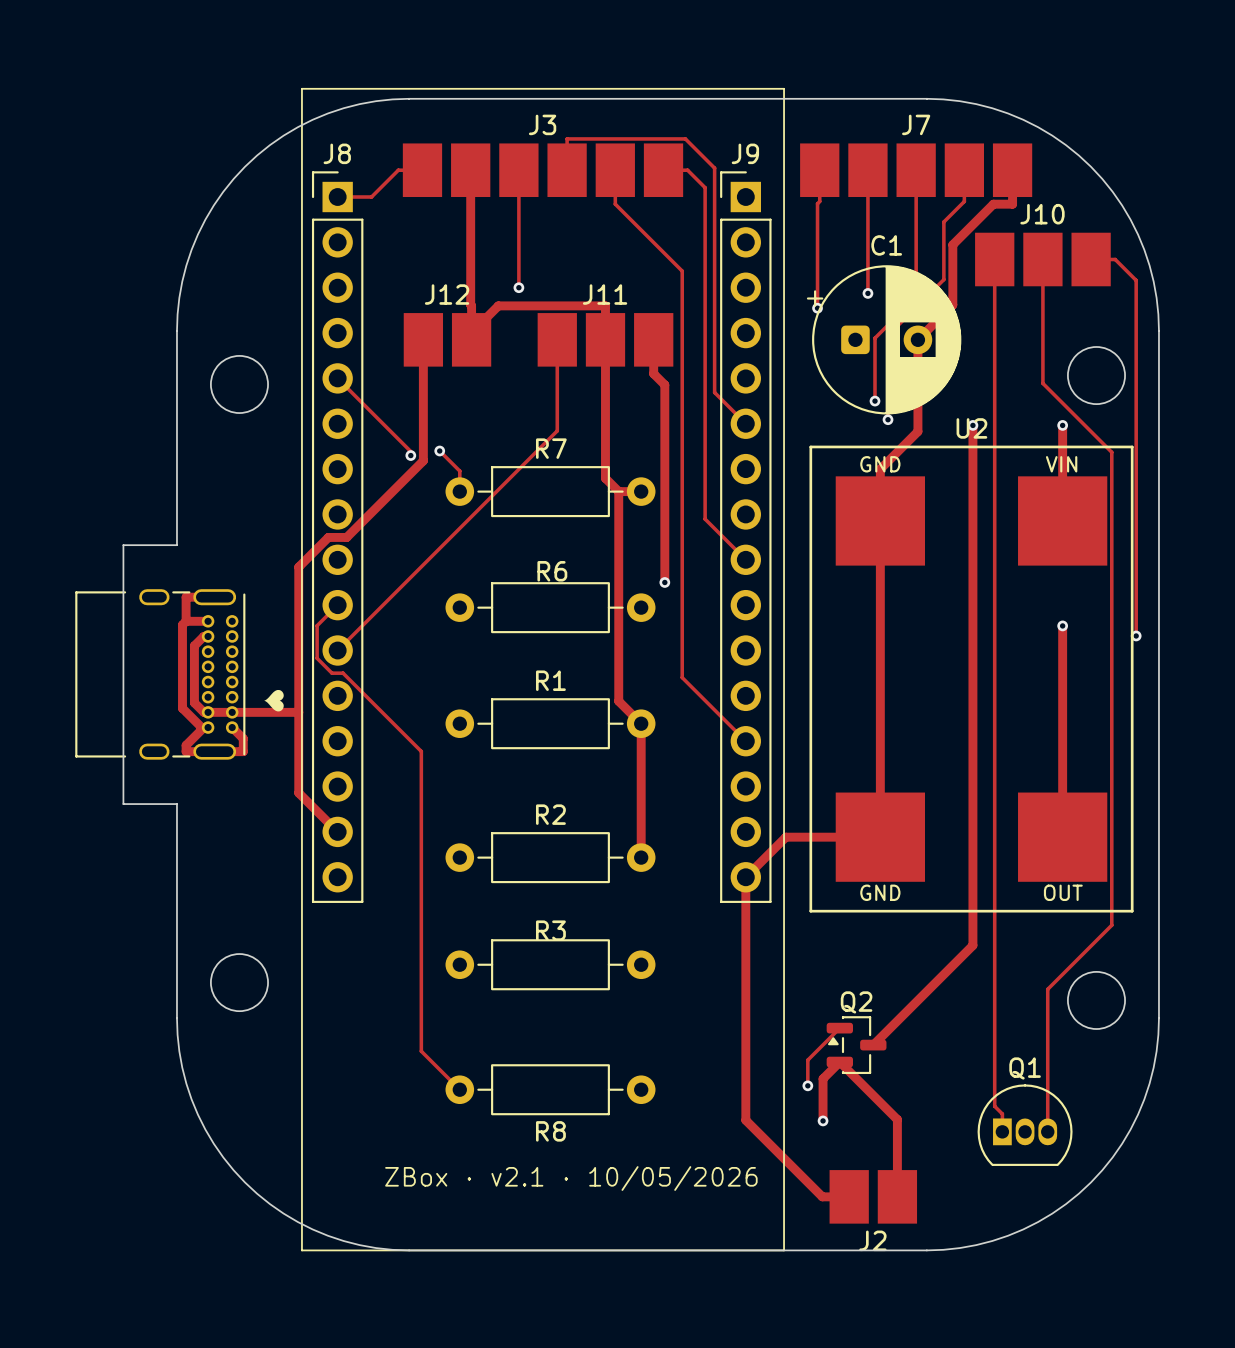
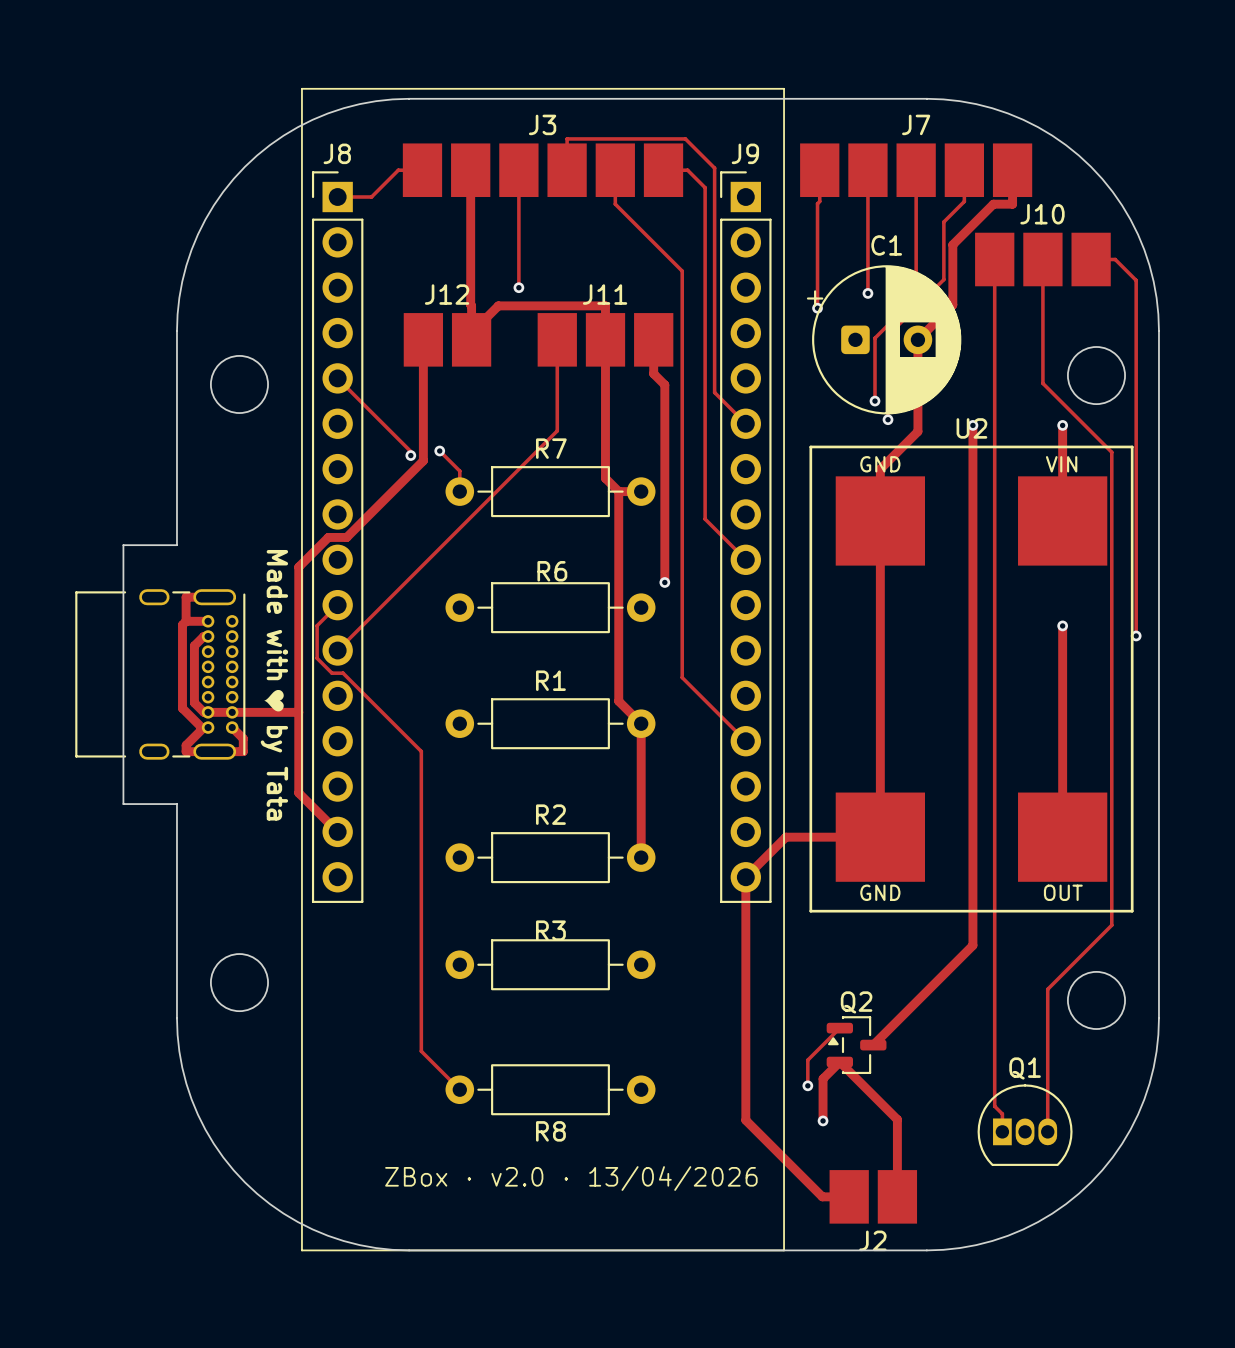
text: none -> Made with by Tata (274, 685)
text: ZBox · v2.1 · 10/05/2026 (571, 1178) -> ZBox · v2.0 · 13/04/2026 (571, 1178)

